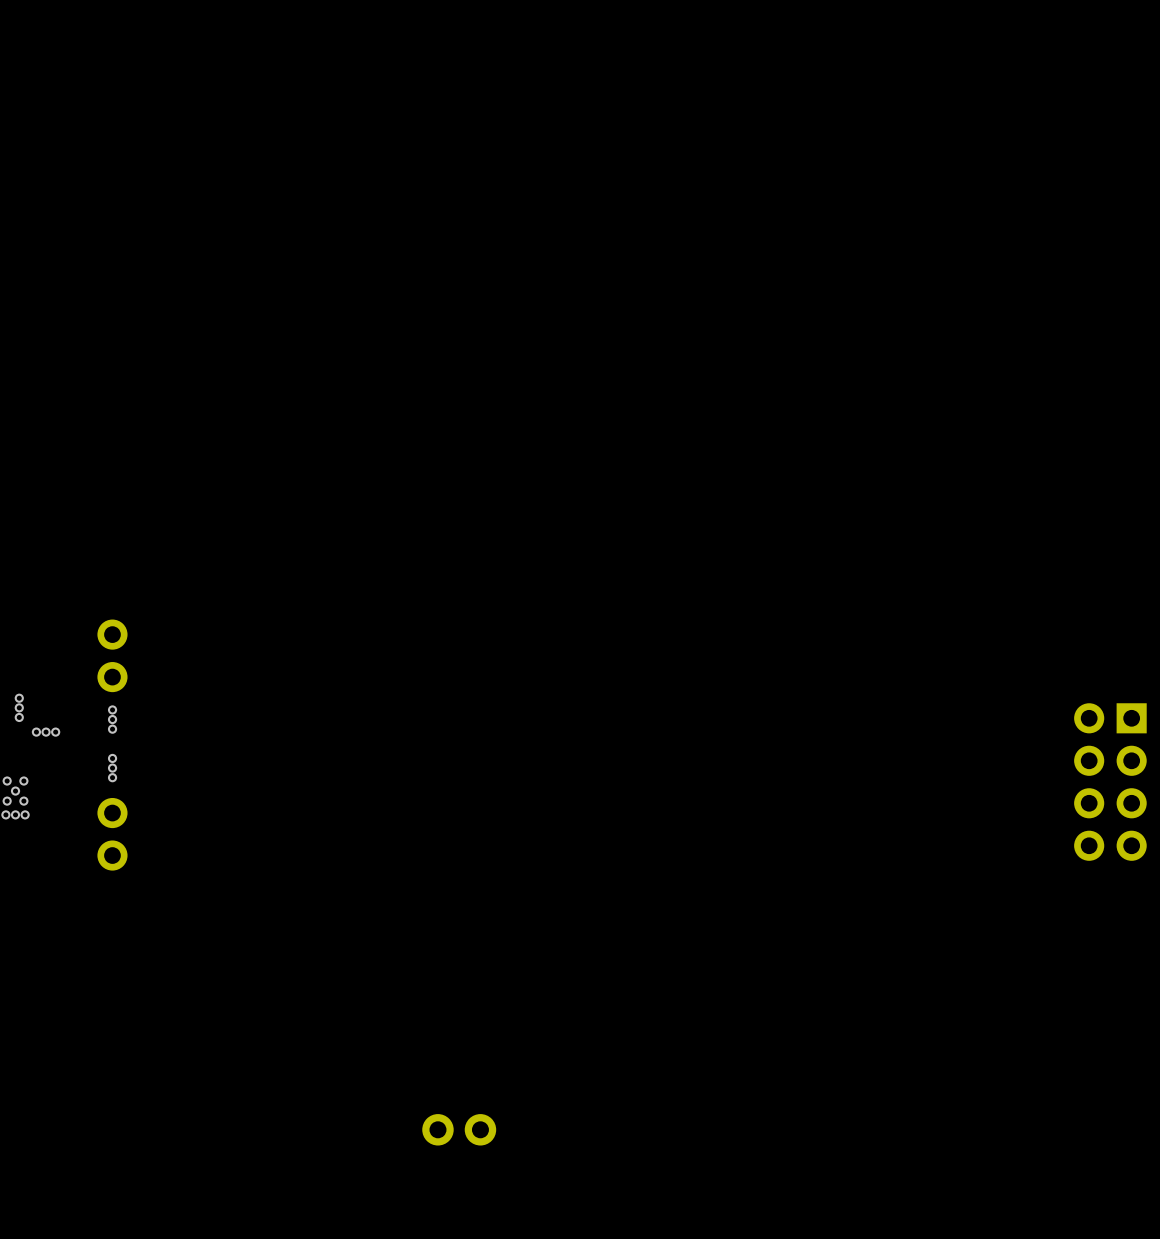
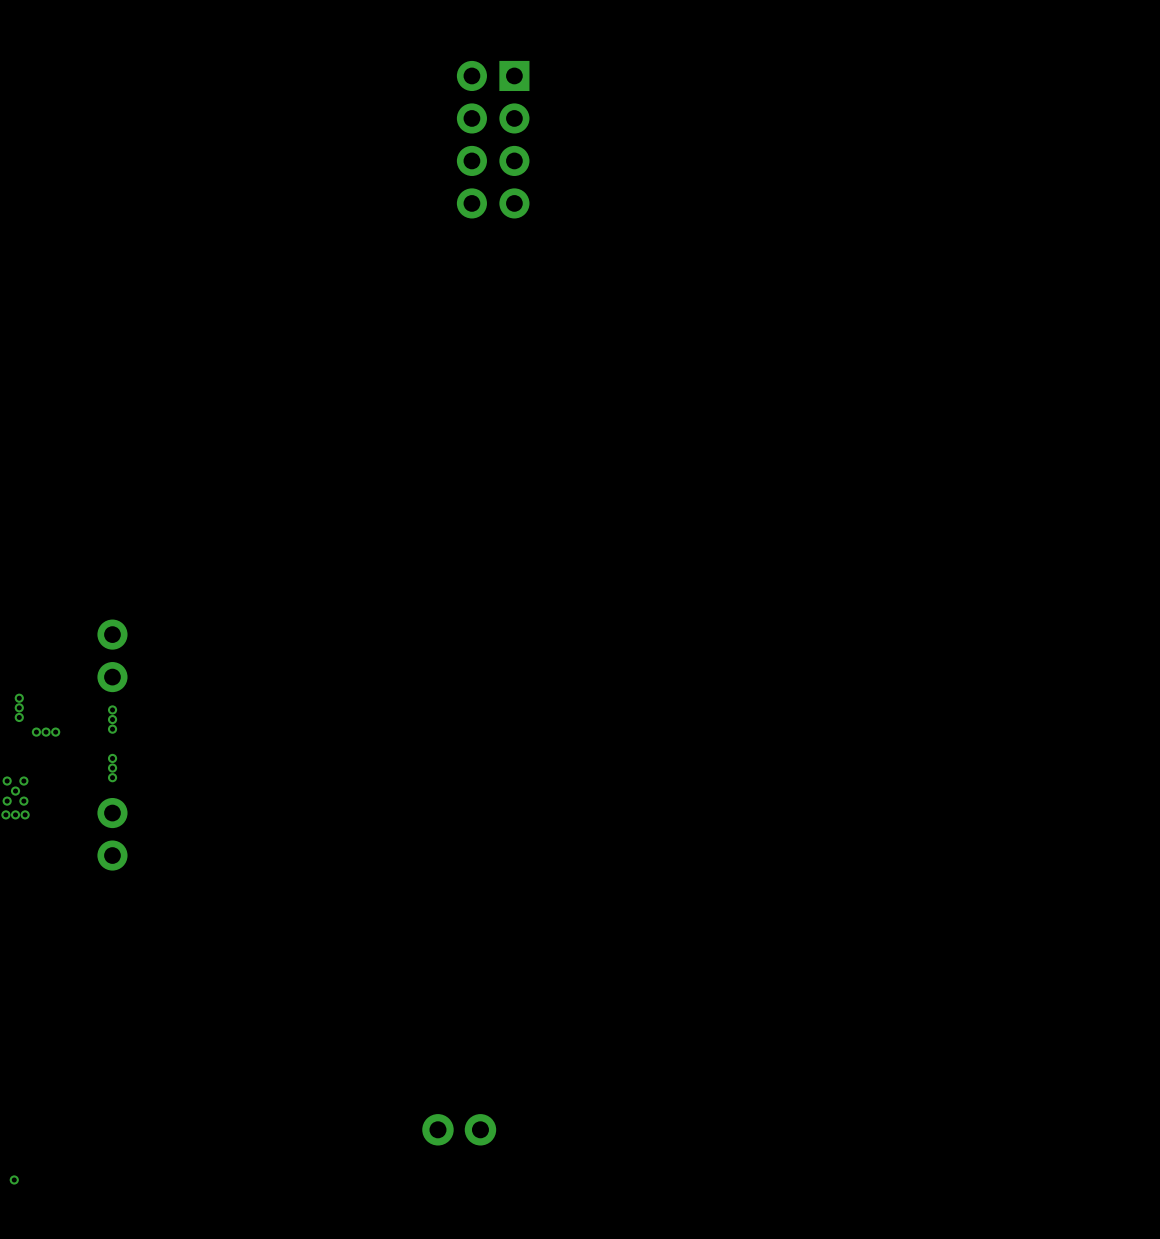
part: none -> (493, 139)
part: (1110, 782) -> none
via: none -> (14, 1179)

